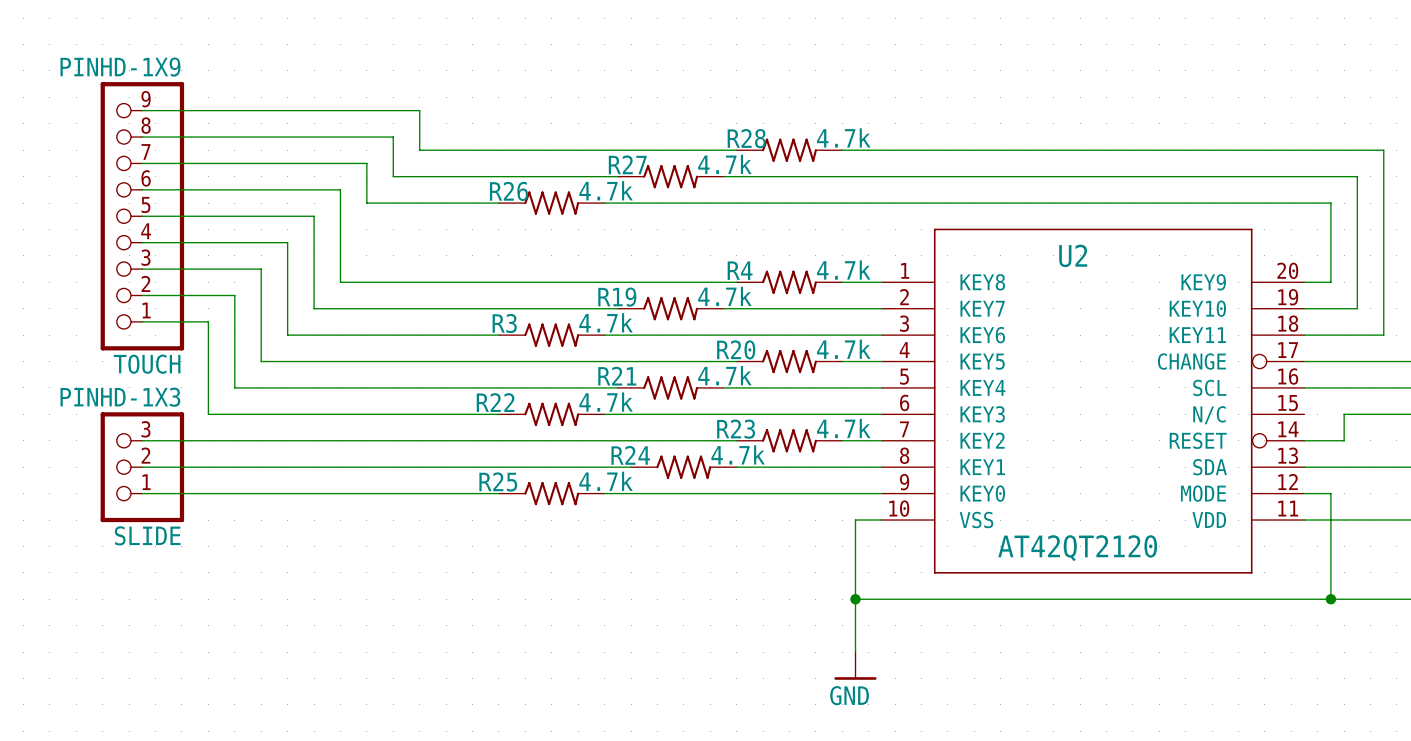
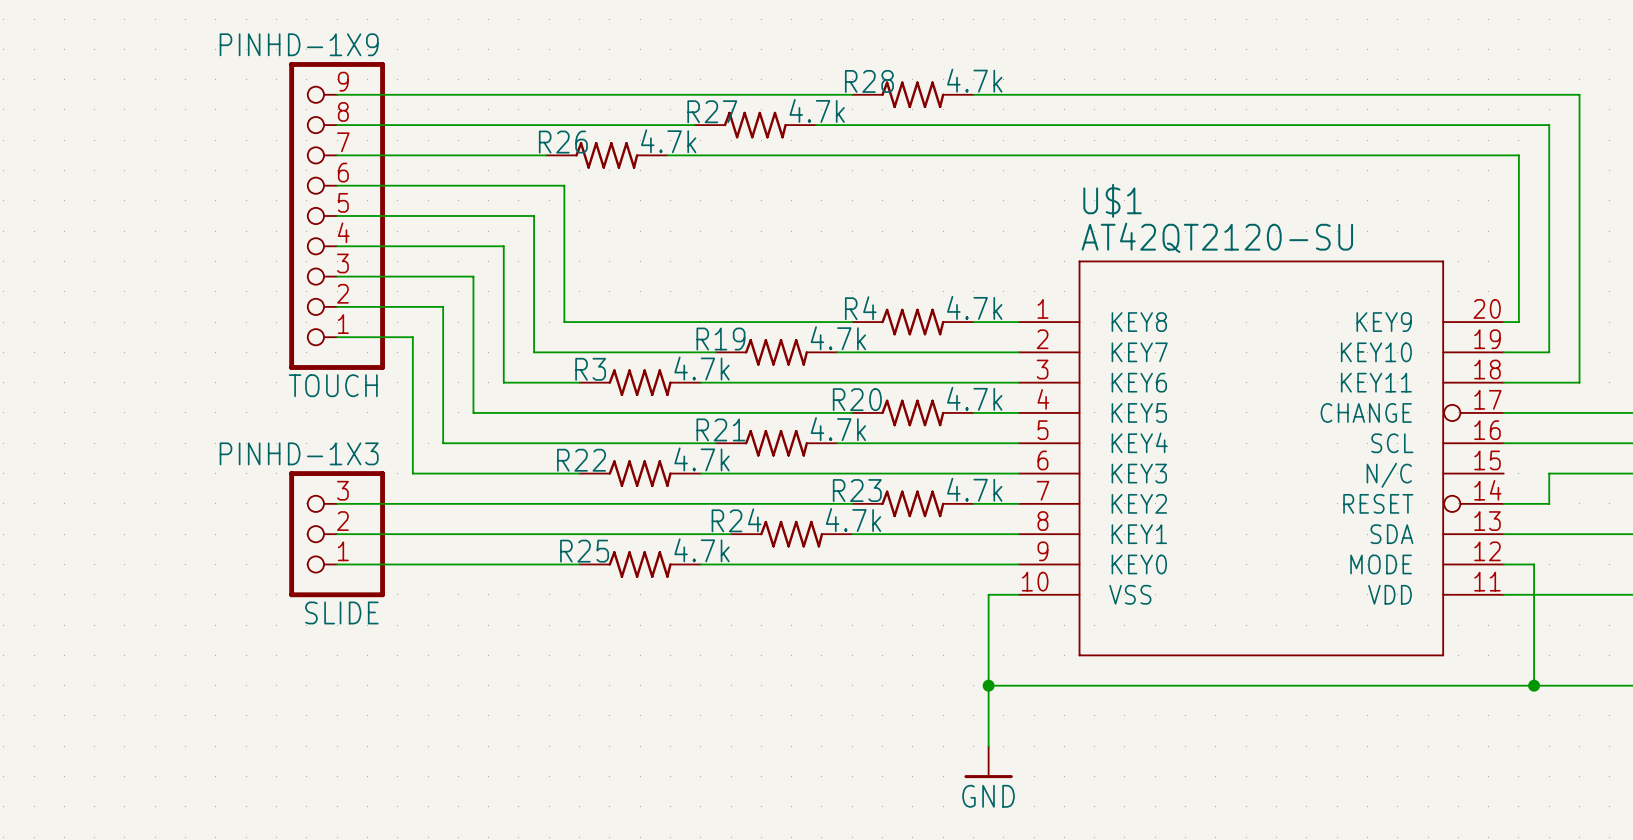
wire: none -> (337, 94) (852, 94)
wire: (142, 110) (287, 110) -> none
wire: (419, 110) (419, 150) (736, 150) -> (488, 125) (694, 125)
wire: (142, 137) (287, 137) -> none
wire: (393, 137) (393, 176) (617, 176) -> (458, 155) (546, 155)
R28 position: (789, 150) -> (912, 94)
wire: (842, 150) (1383, 150) (1383, 335) (1370, 335) -> (973, 94) (1579, 94) (1579, 382)
wire: (142, 163) (287, 163) -> none
wire: (366, 163) (366, 203) (498, 203) -> none
R27 position: (670, 176) -> (755, 125)
wire: (723, 176) (1357, 176) (1357, 308) (1344, 308) -> (815, 125) (1549, 125) (1549, 352)
wire: (142, 189) (287, 189) -> none
wire: (340, 189) (340, 282) (485, 282) -> (428, 185) (564, 185) (564, 322)
wire: none -> (397, 215) (534, 215) (534, 352)
R26 position: (551, 203) -> (606, 155)
wire: (604, 203) (1330, 203) (1330, 282) (1317, 282) -> (667, 155) (1518, 155) (1518, 322)
wire: (142, 216) (287, 216) -> none
TOUCH position: (142, 216) -> (337, 215)
wire: (314, 216) (314, 308) (459, 308) -> (367, 246) (503, 246) (503, 382)
wire: (142, 242) (287, 242) (287, 335) (432, 335) -> none
U2 name: U2 (1073, 255) -> U$1 (1112, 200)
wire: (142, 269) (261, 269) (261, 361) (406, 361) -> (337, 276) (473, 276) (473, 412)
wire: (142, 295) (234, 295) (234, 387) (380, 387) -> (337, 306) (443, 306) (443, 443)
wire: (142, 321) (208, 321) (208, 414) (353, 414) -> (337, 337) (412, 337) (412, 473)
wire: (142, 440) (287, 440) -> none
wire: (142, 467) (287, 467) -> none
SLIDE position: (142, 467) -> (337, 534)
wire: (142, 493) (287, 493) -> none
U2 value: AT42QT2120 (1077, 548) -> AT42QT2120-SU (1217, 237)

